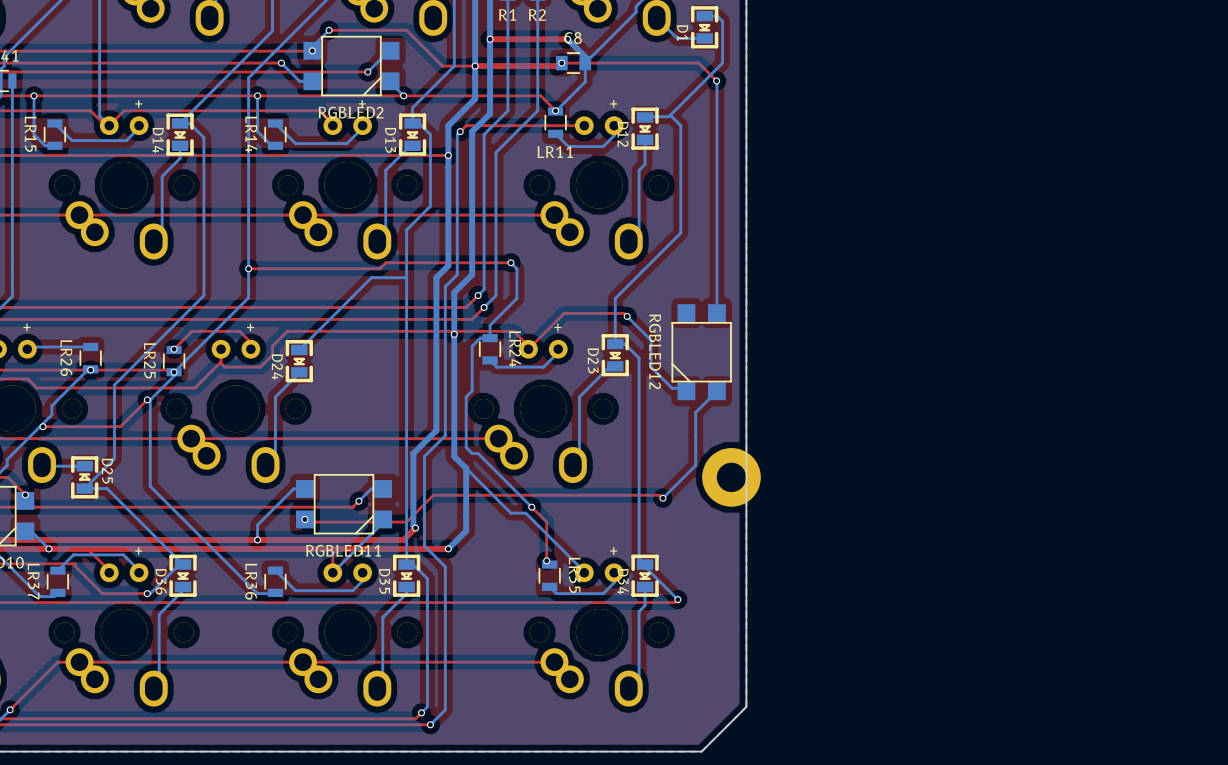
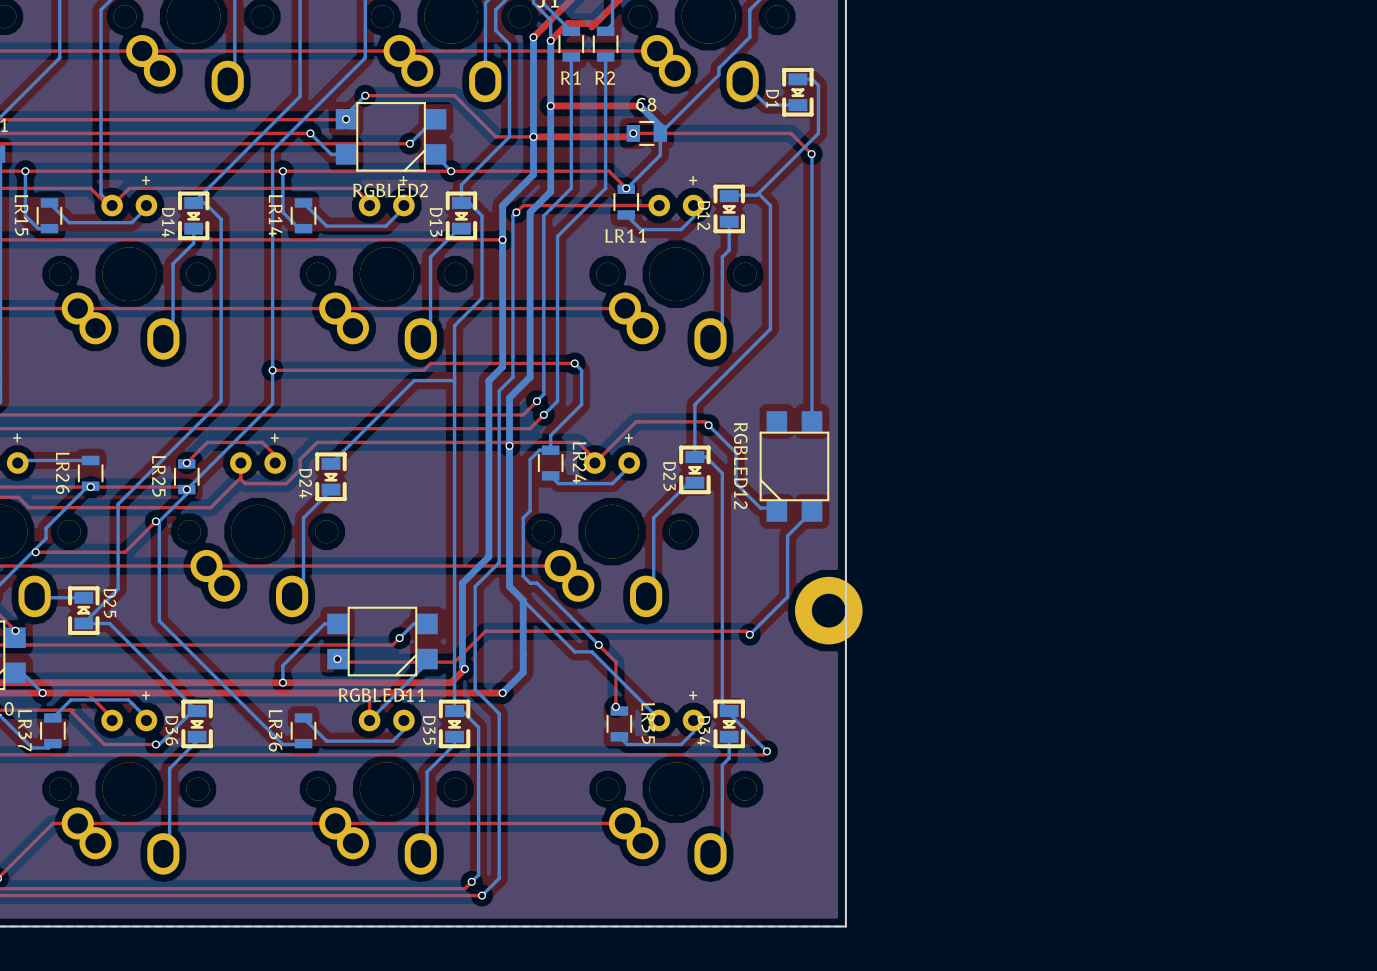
board edge: (746, 706) (701, 751) -> (845, 874) (845, 926) (794, 926)

